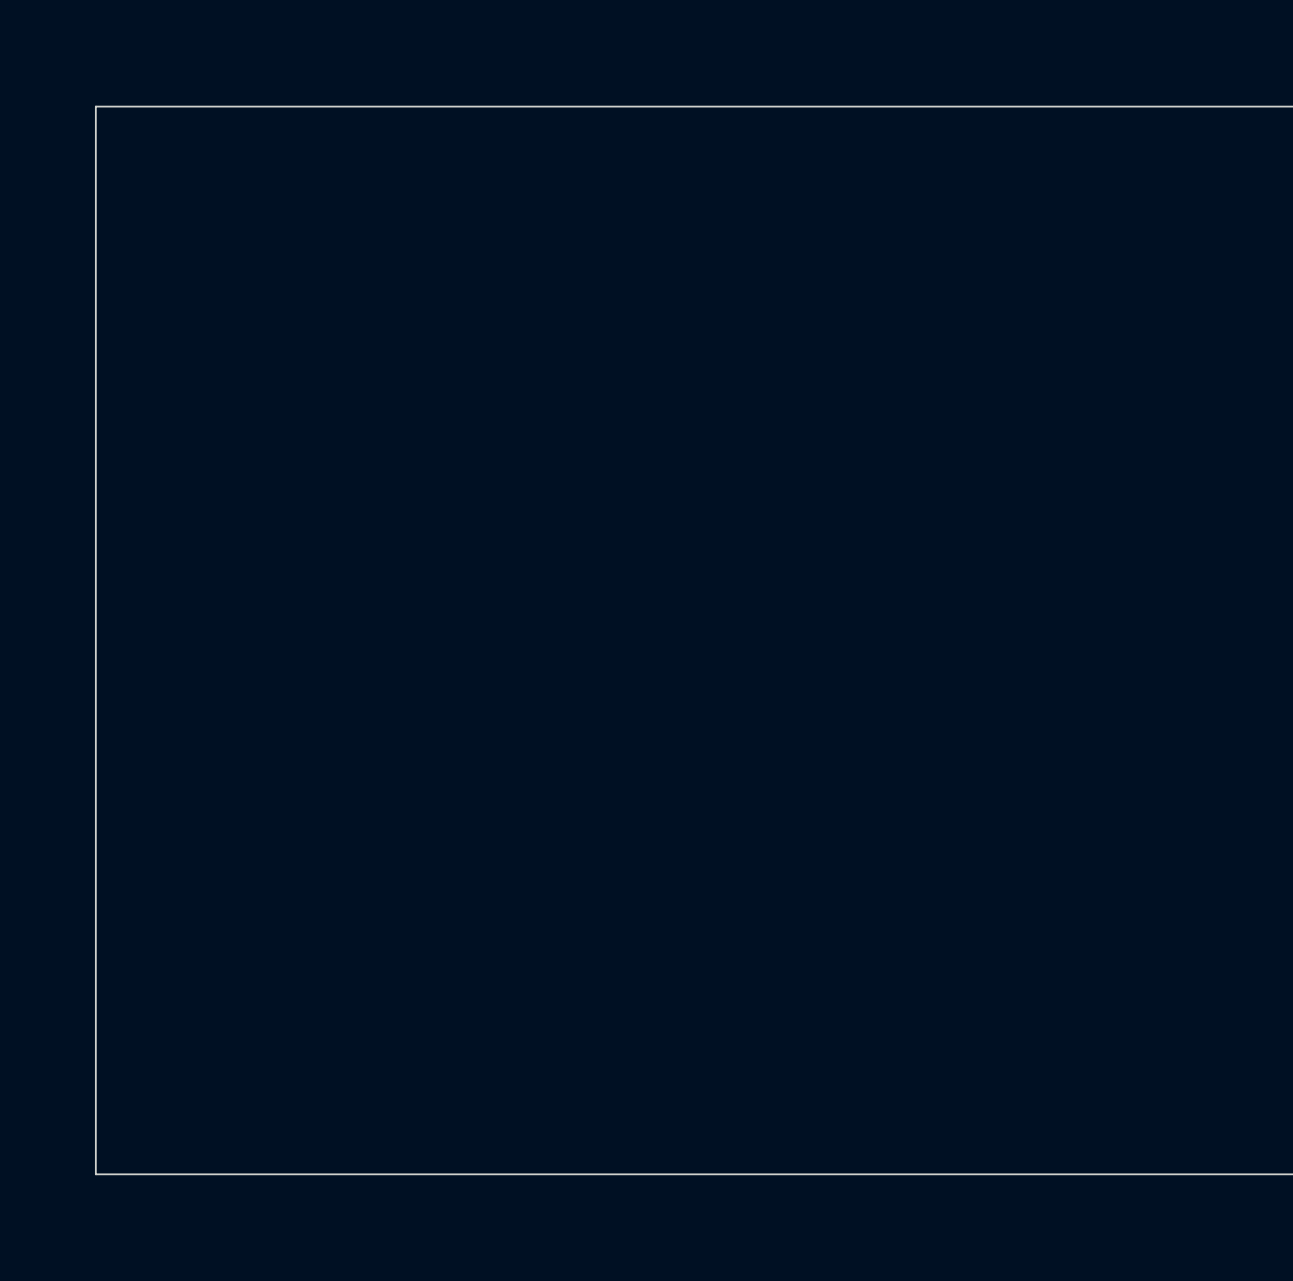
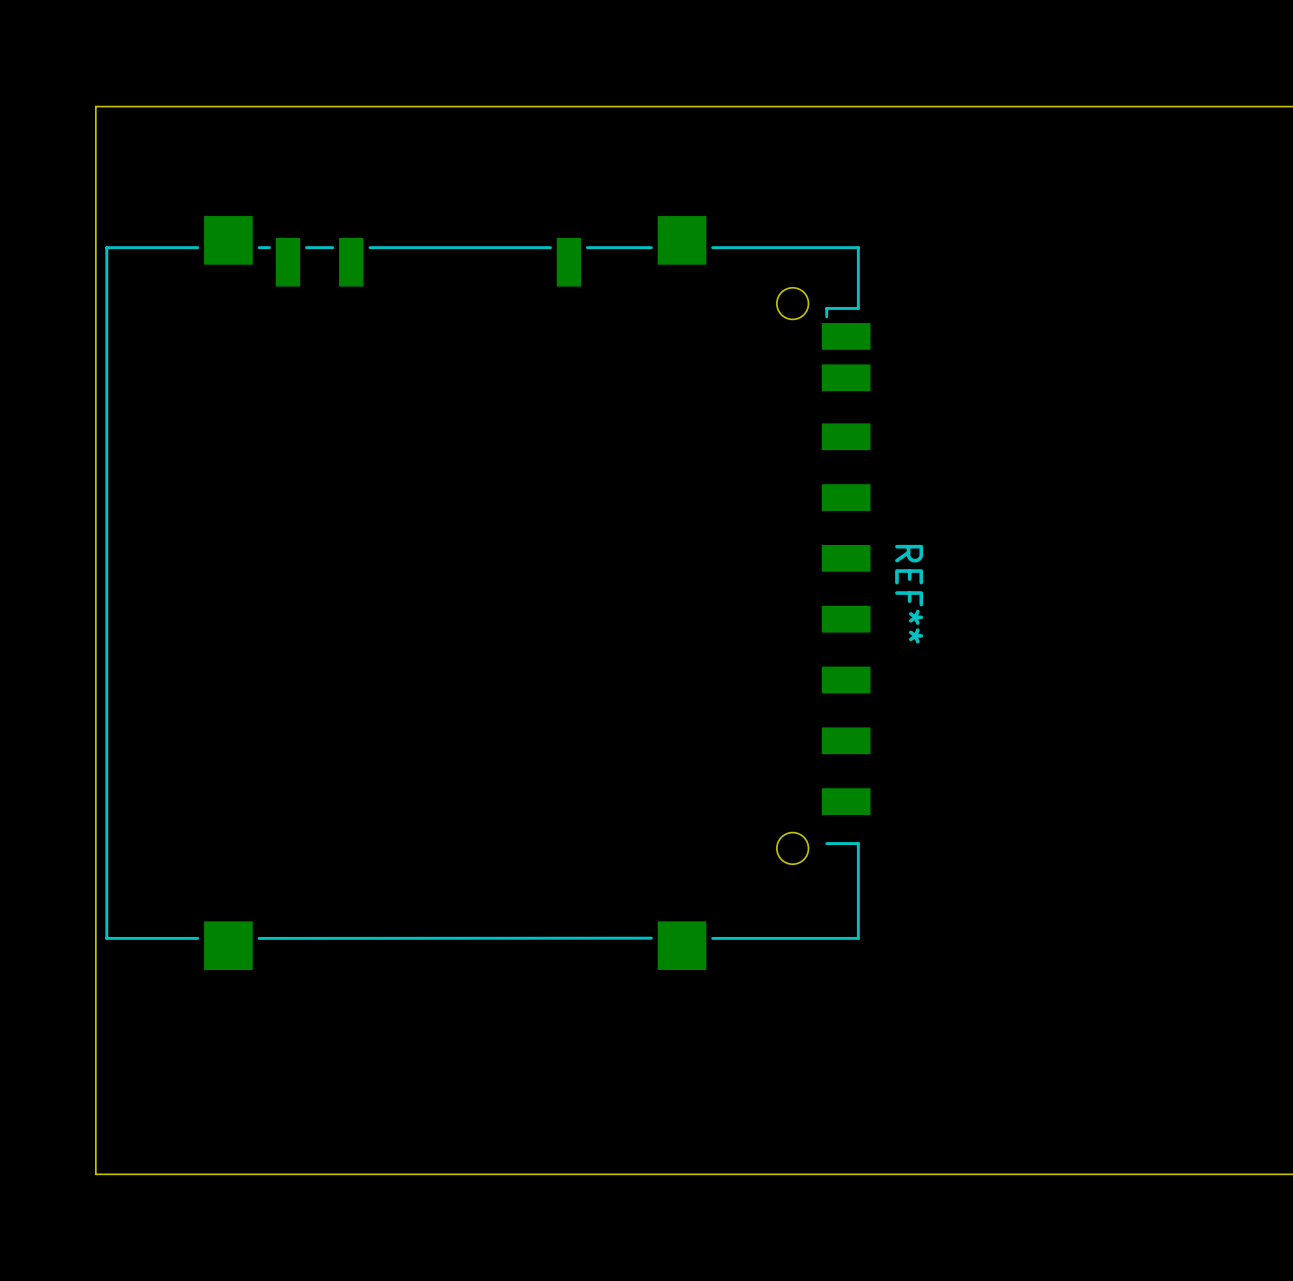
REF**: none -> (487, 593)

